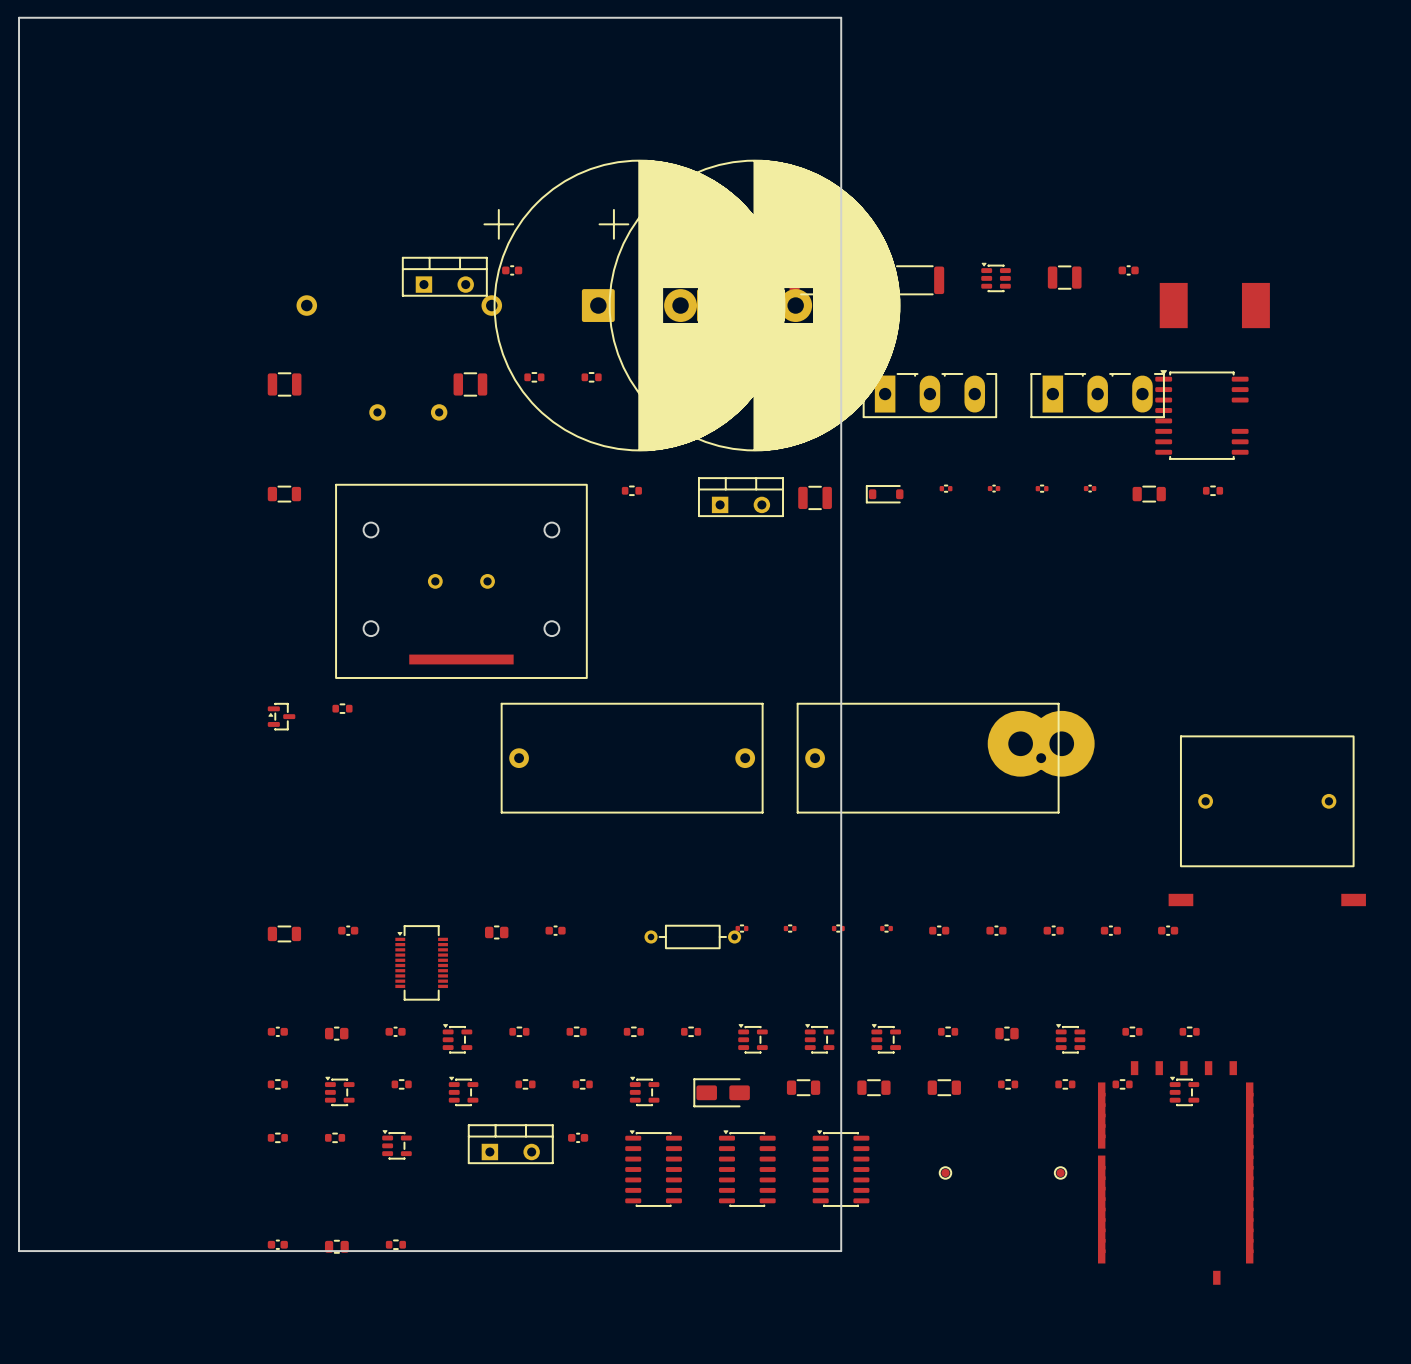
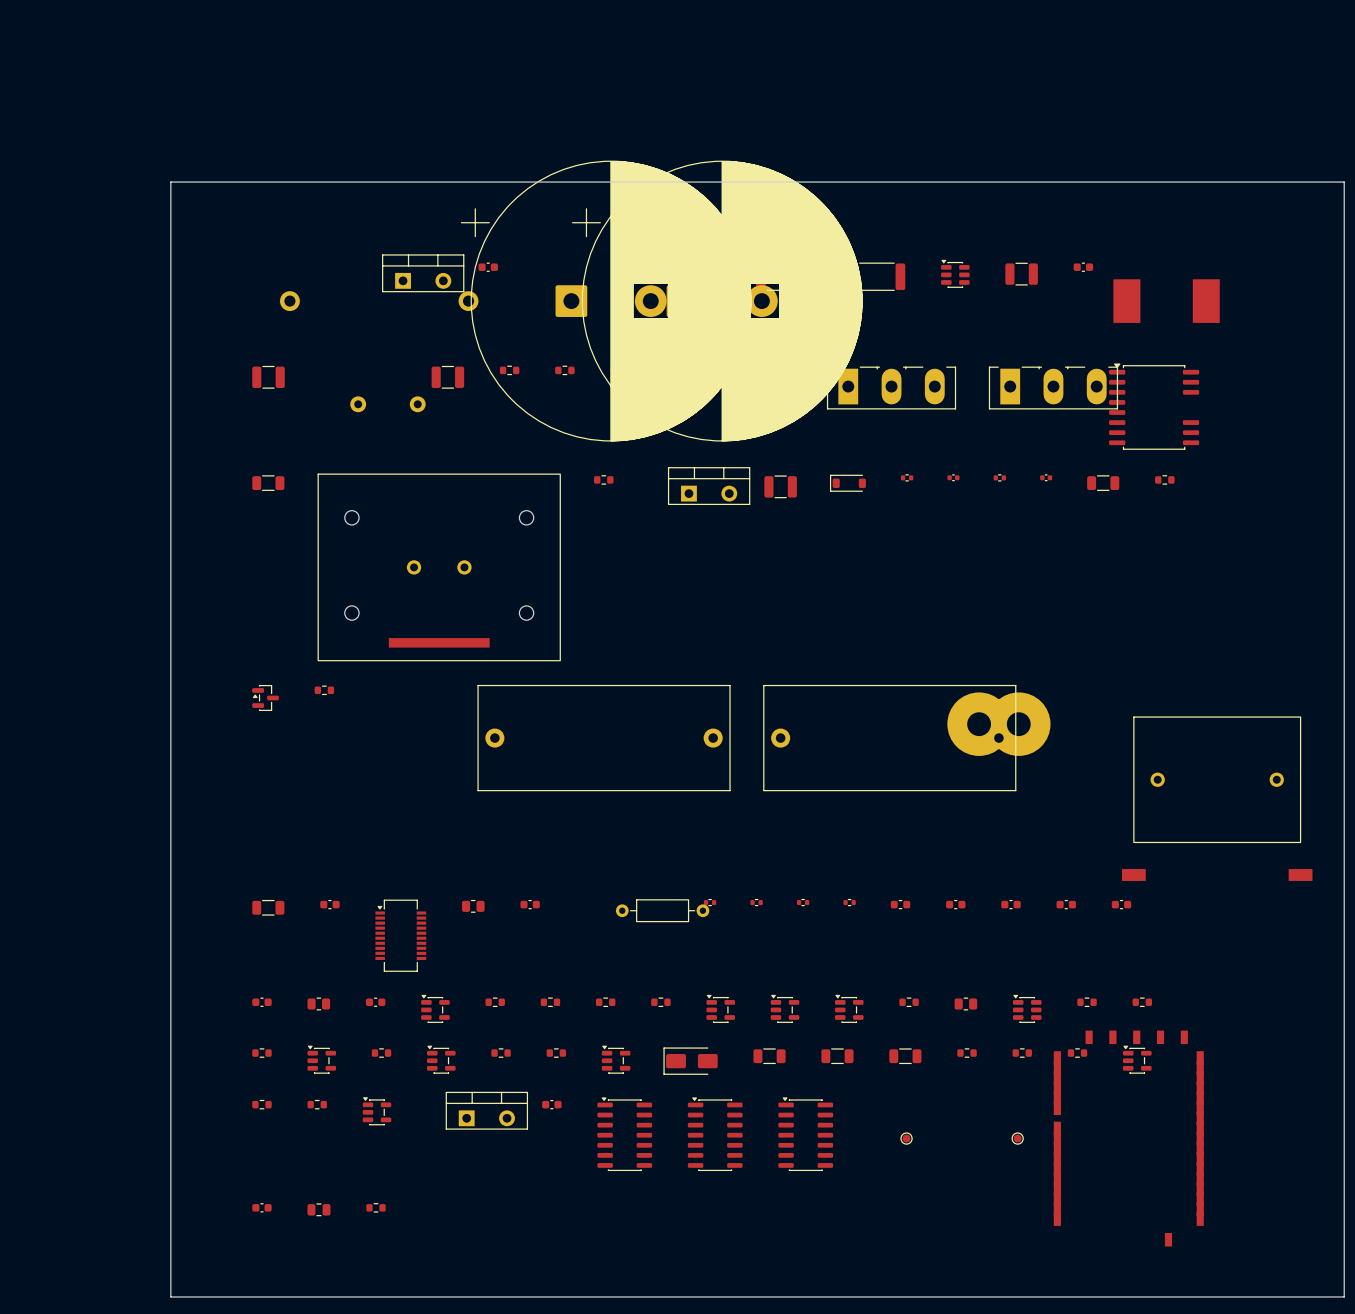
board edge: (19, 17) (841, 17) (841, 1251) (19, 1251) (19, 17) -> none
board edge: none -> (170, 182) (1344, 182) (1344, 1296) (170, 1296) (170, 182)

